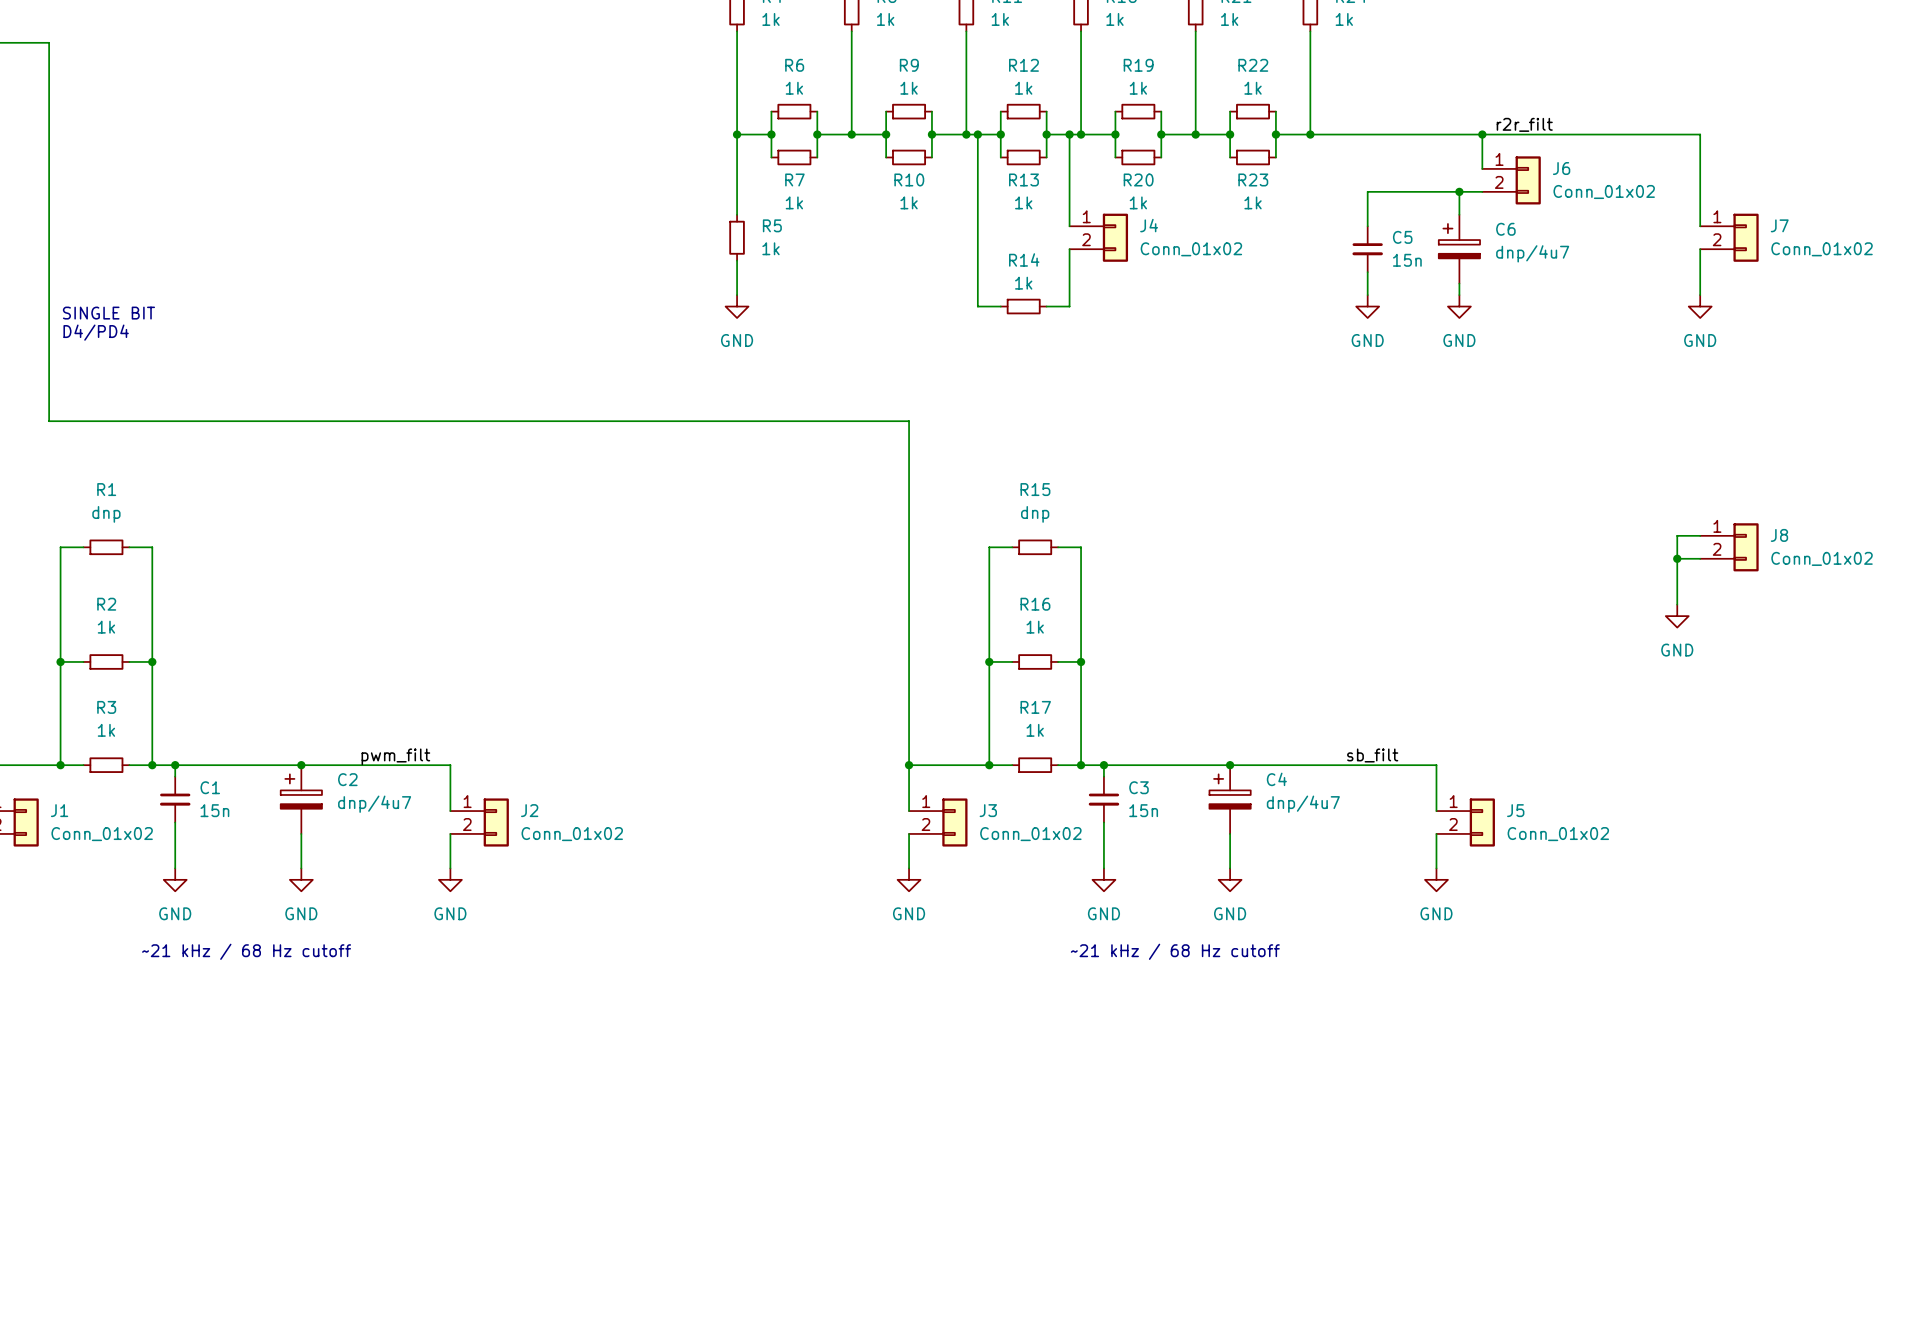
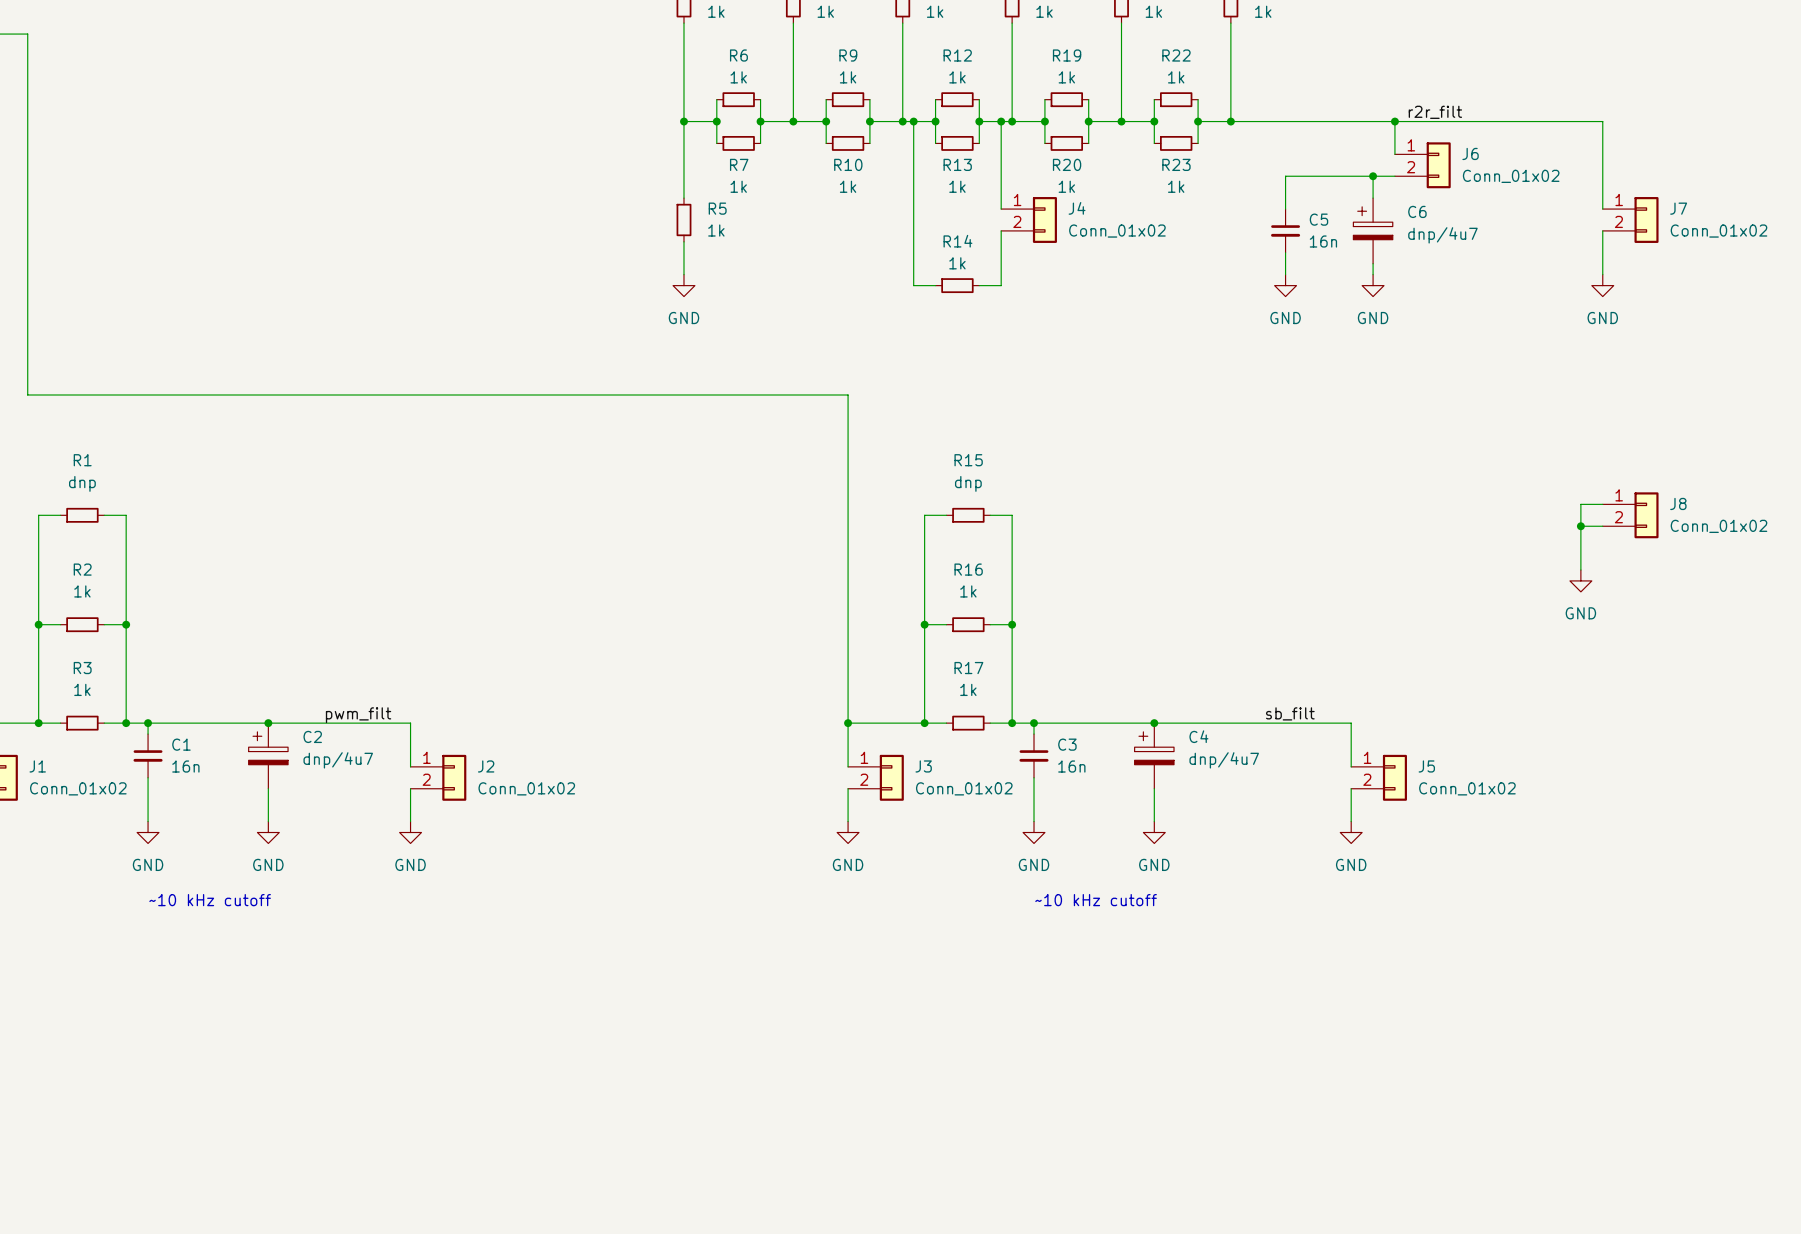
C5 value: 15n (1407, 260) -> 16n (1323, 241)
text: SINGLE BIT (108, 313) -> none
text: D4/PD4 (96, 332) -> none
C1 value: 15n (214, 810) -> 16n (185, 766)
C3 value: 15n (1143, 810) -> 16n (1071, 766)
text: ~21 kHz / 68 Hz cutoff (246, 951) -> ~10 kHz cutoff (210, 900)
text: ~21 kHz / 68 Hz cutoff (1175, 951) -> ~10 kHz cutoff (1096, 900)

